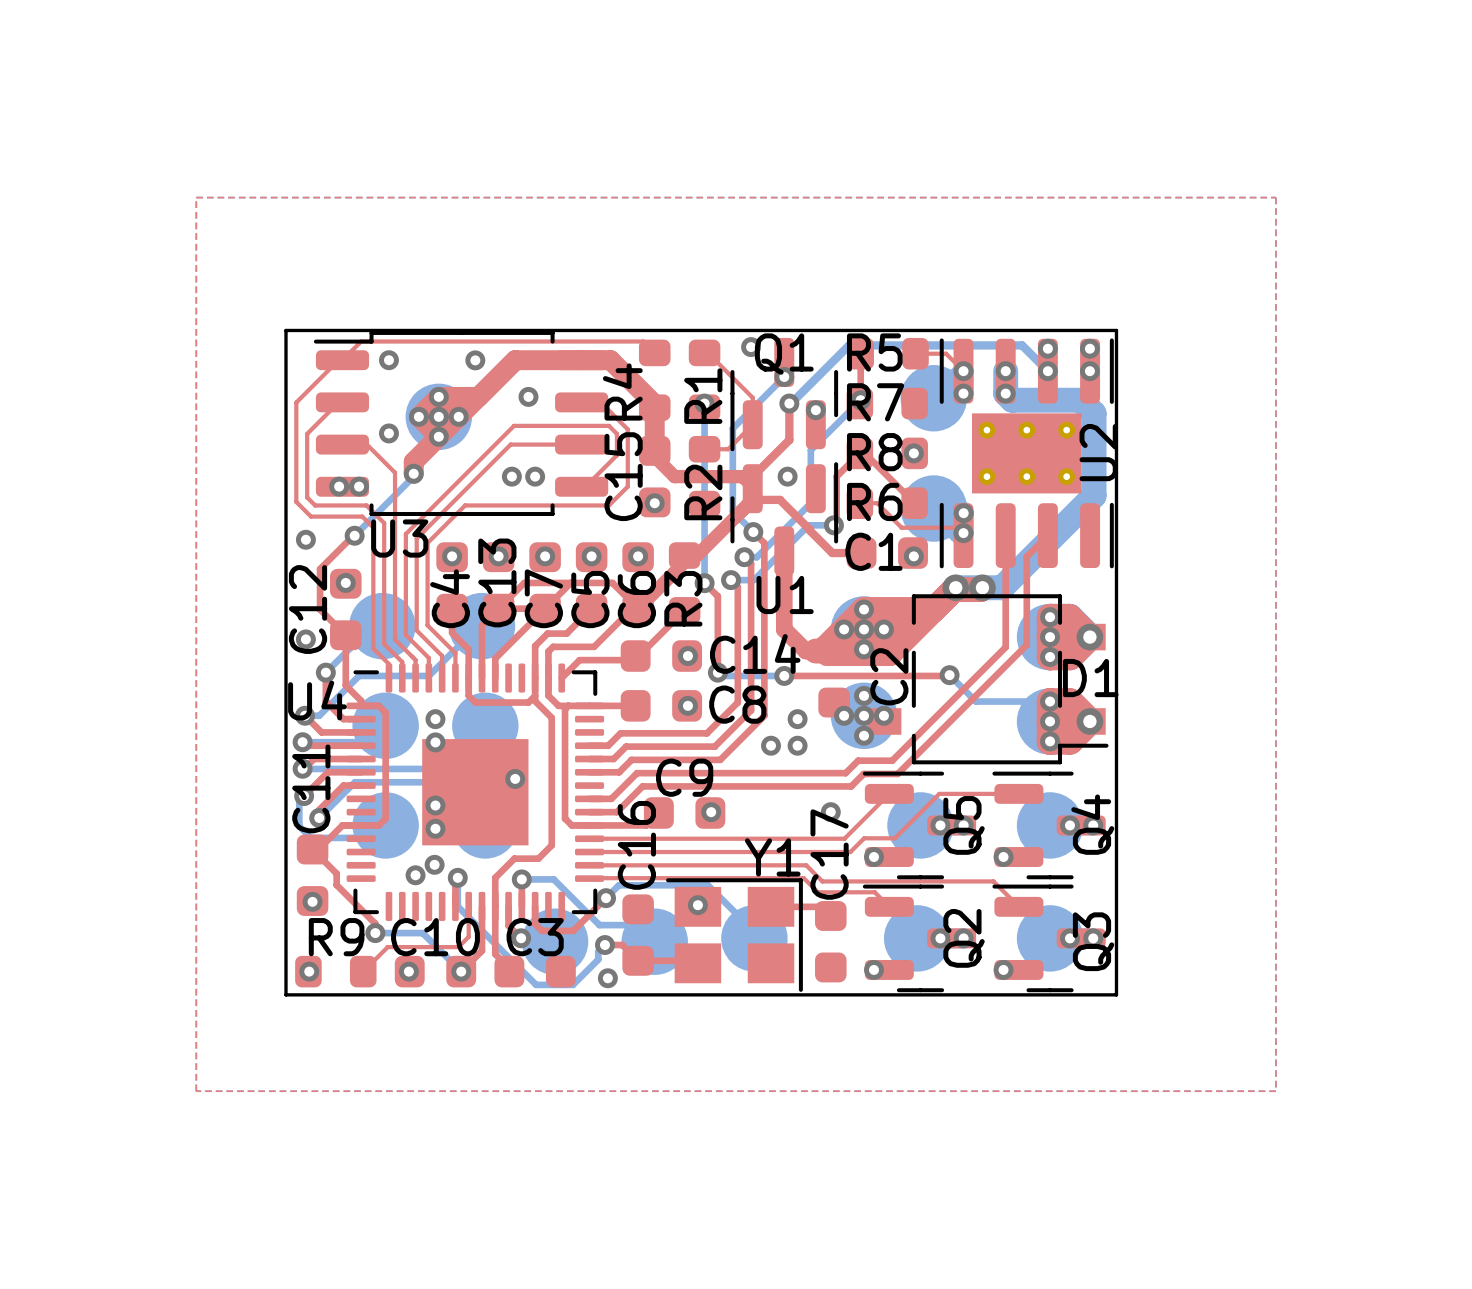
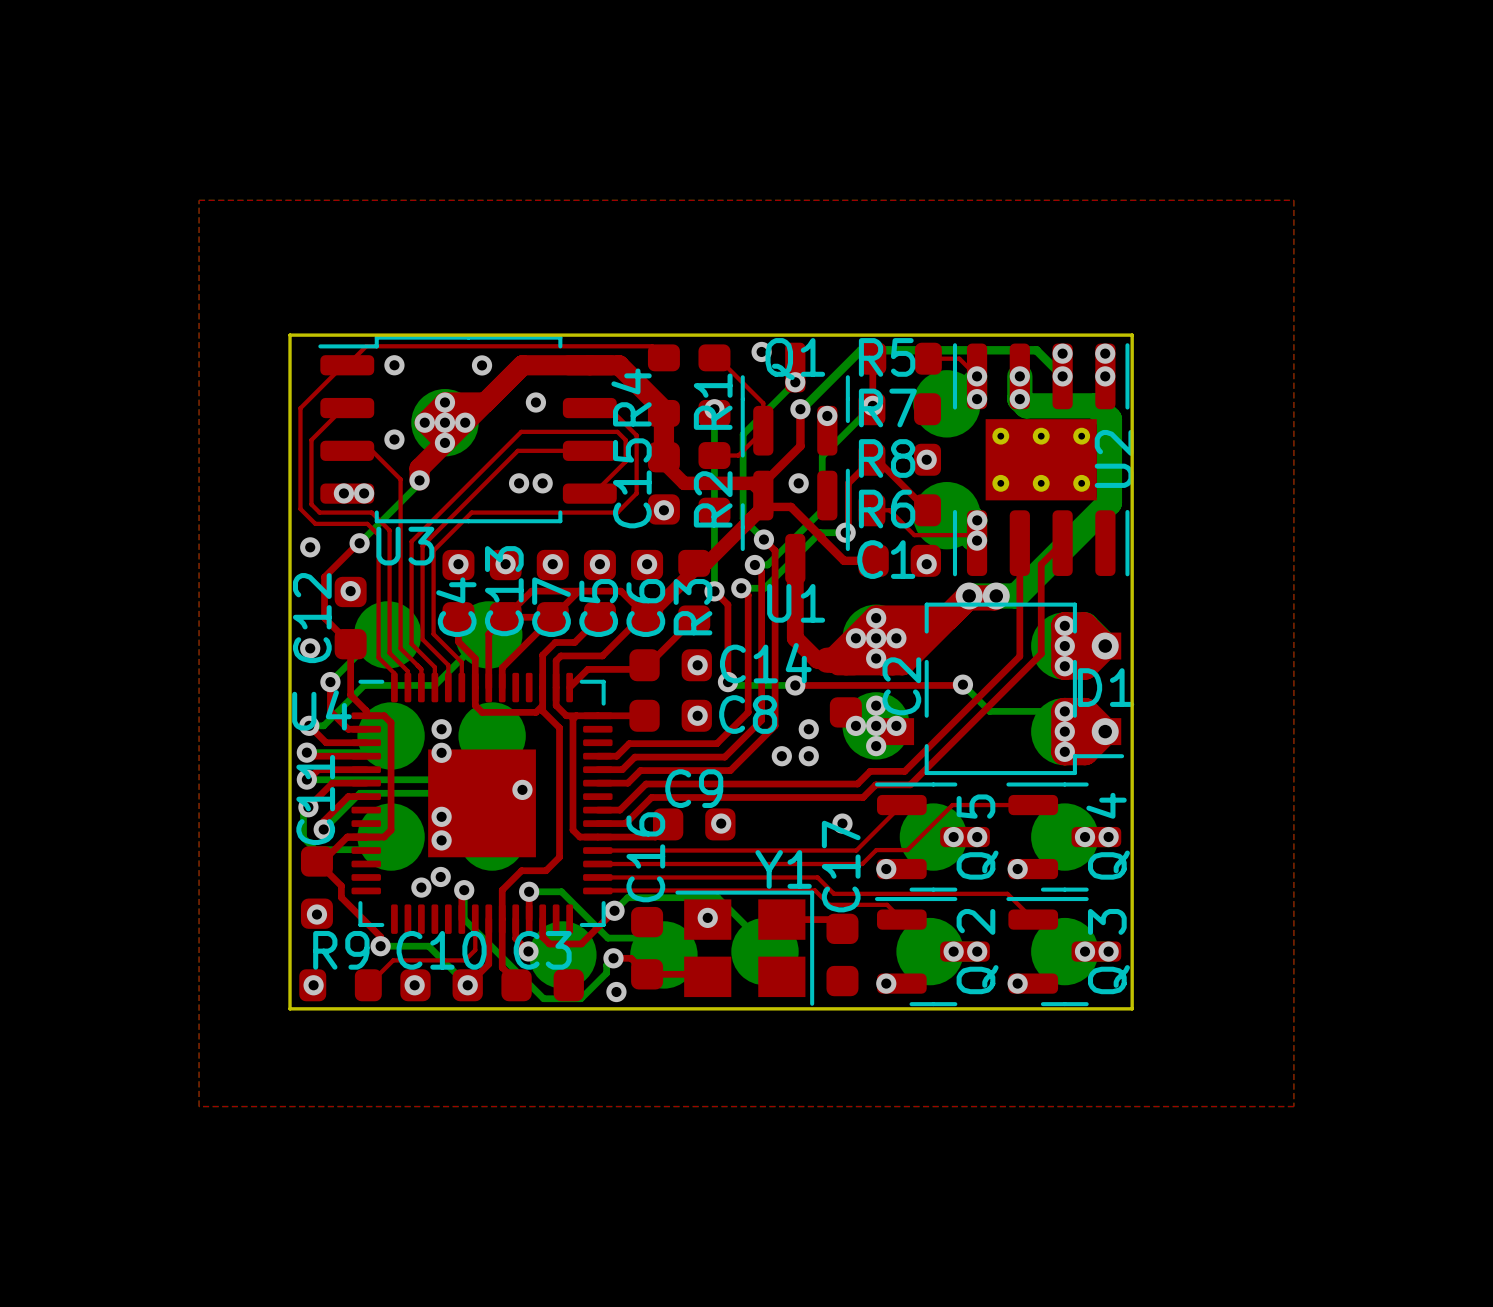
Q4 name: Q4 (1092, 824) -> Q 4 (1108, 836)
Q5 name: Q5 (964, 825) -> Q 5 (977, 837)
Q2 name: Q2 (964, 938) -> Q 2 (977, 951)
Q3 name: Q3 (1093, 941) -> Q 3 (1108, 951)

